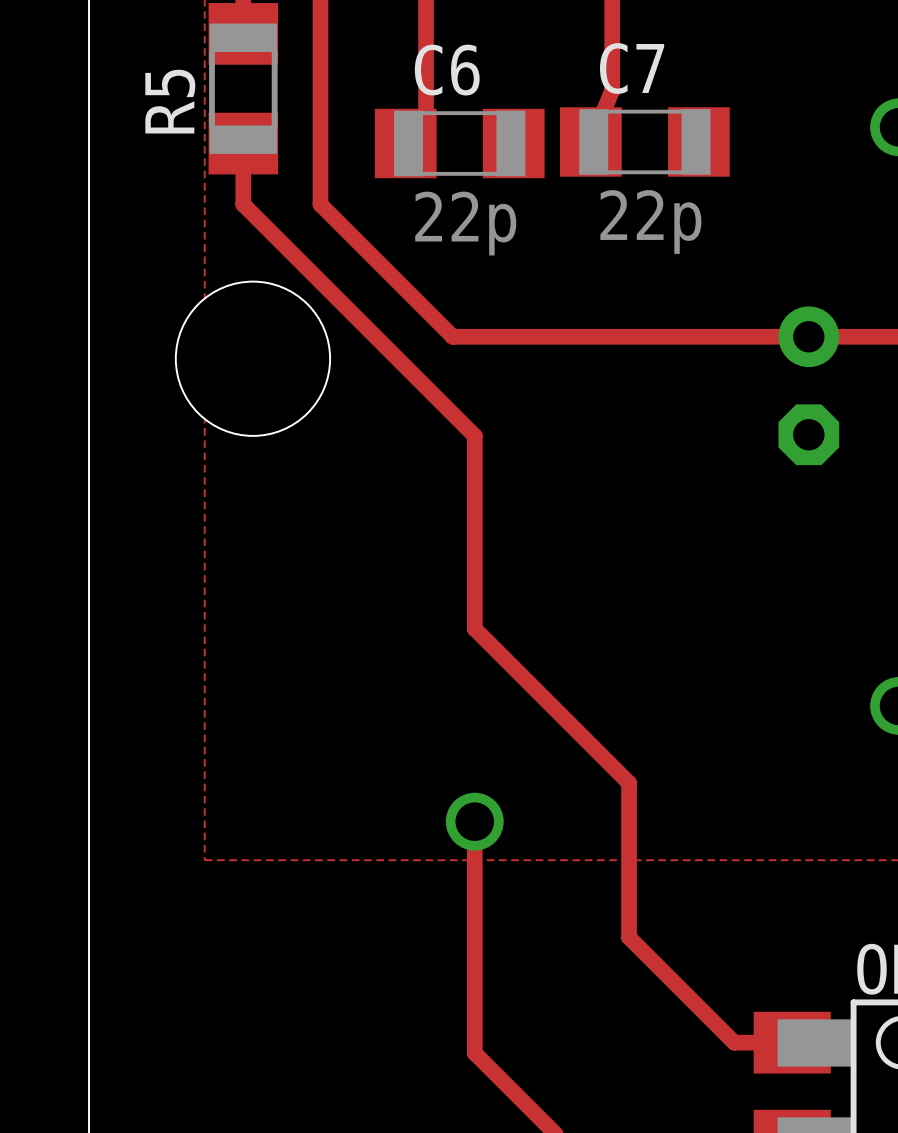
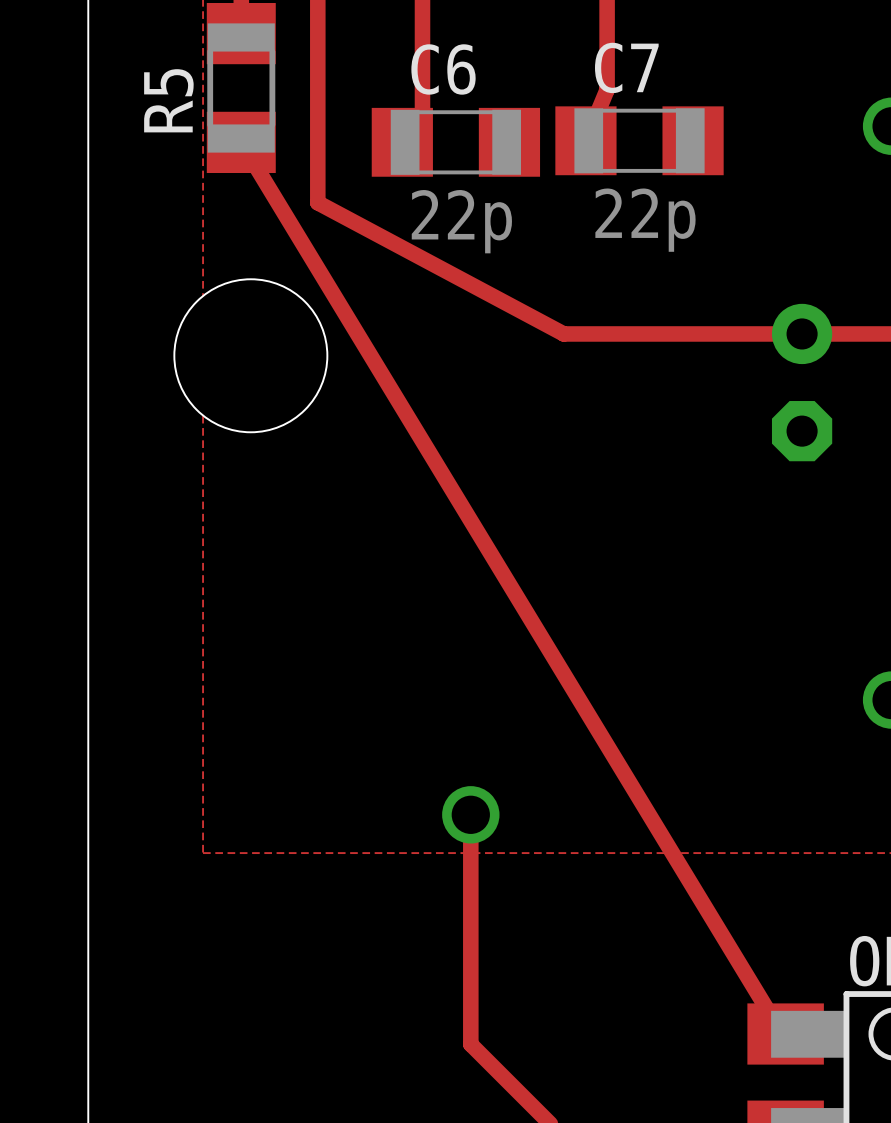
track: (243, 143) (243, 204) (474, 435) (474, 628) (629, 783) (629, 937) (734, 1042) (792, 1042) -> (241, 142) (776, 1025) (785, 1034)
track: (320, 204) (452, 336) (568, 336) -> (317, 202) (563, 333)

